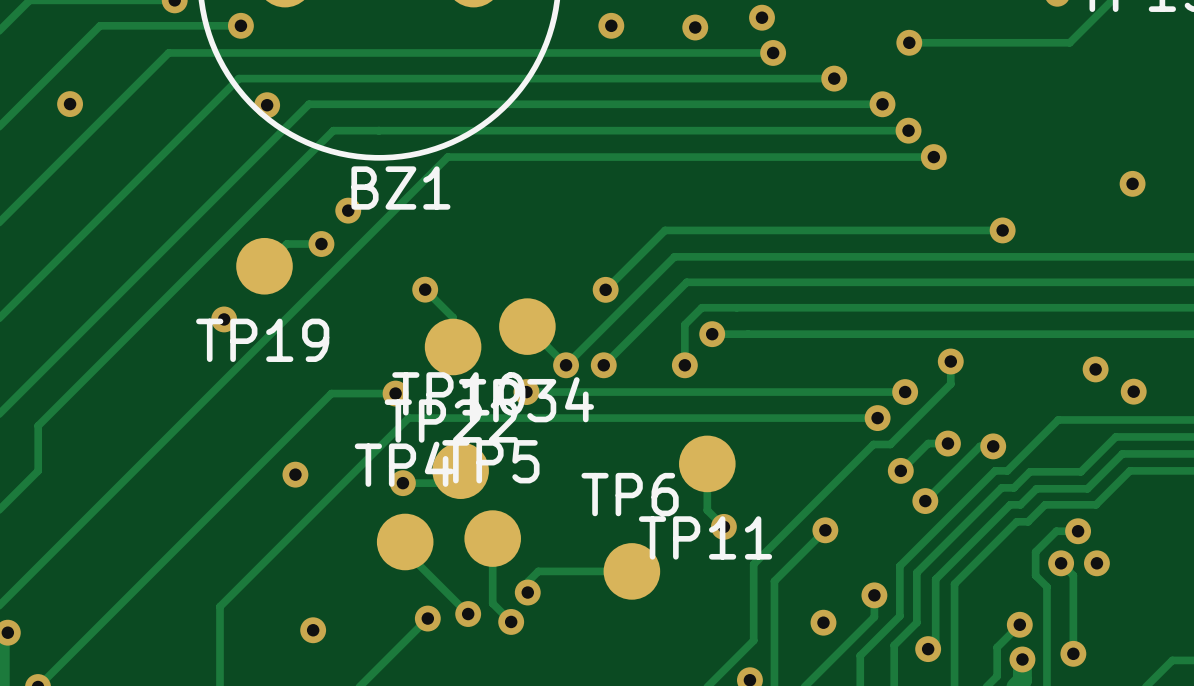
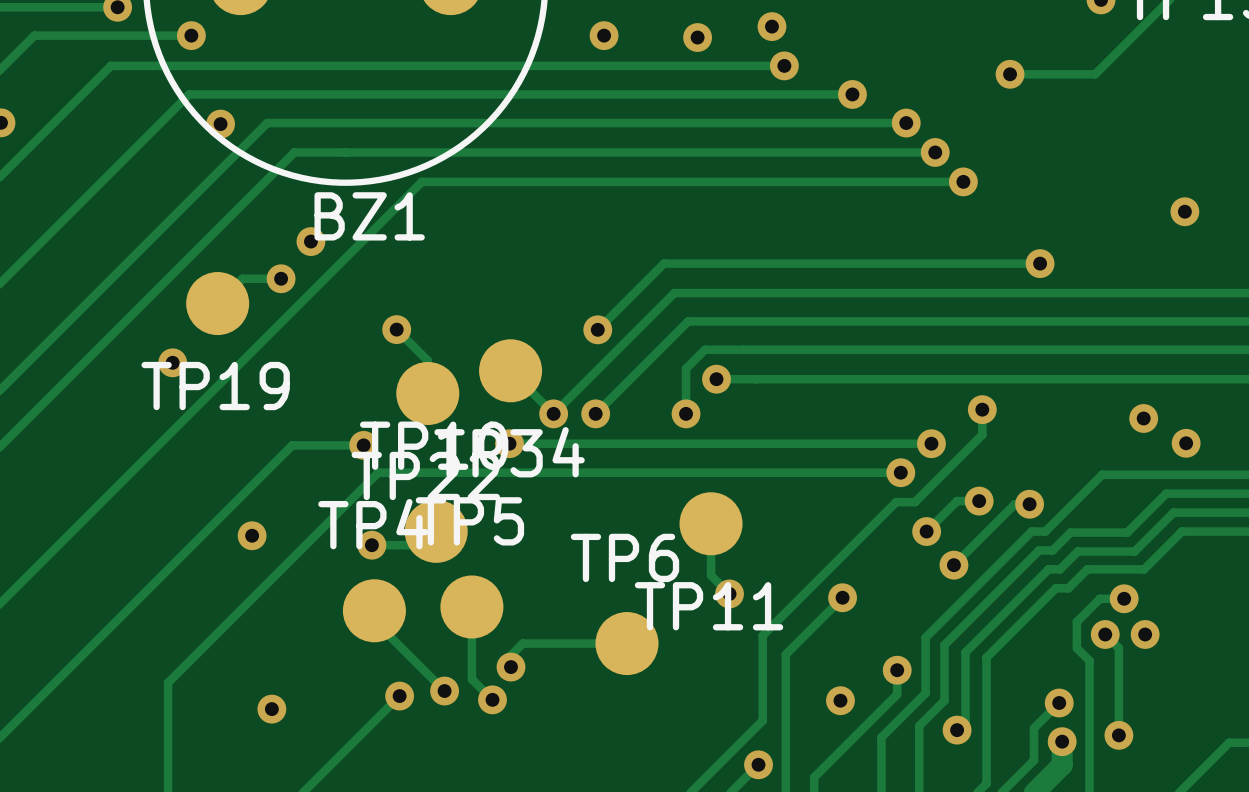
via position: (909, 42) -> (1010, 74)
track: (1069, 42) (909, 42) -> (1114, 54) (1095, 74) (1010, 74)

